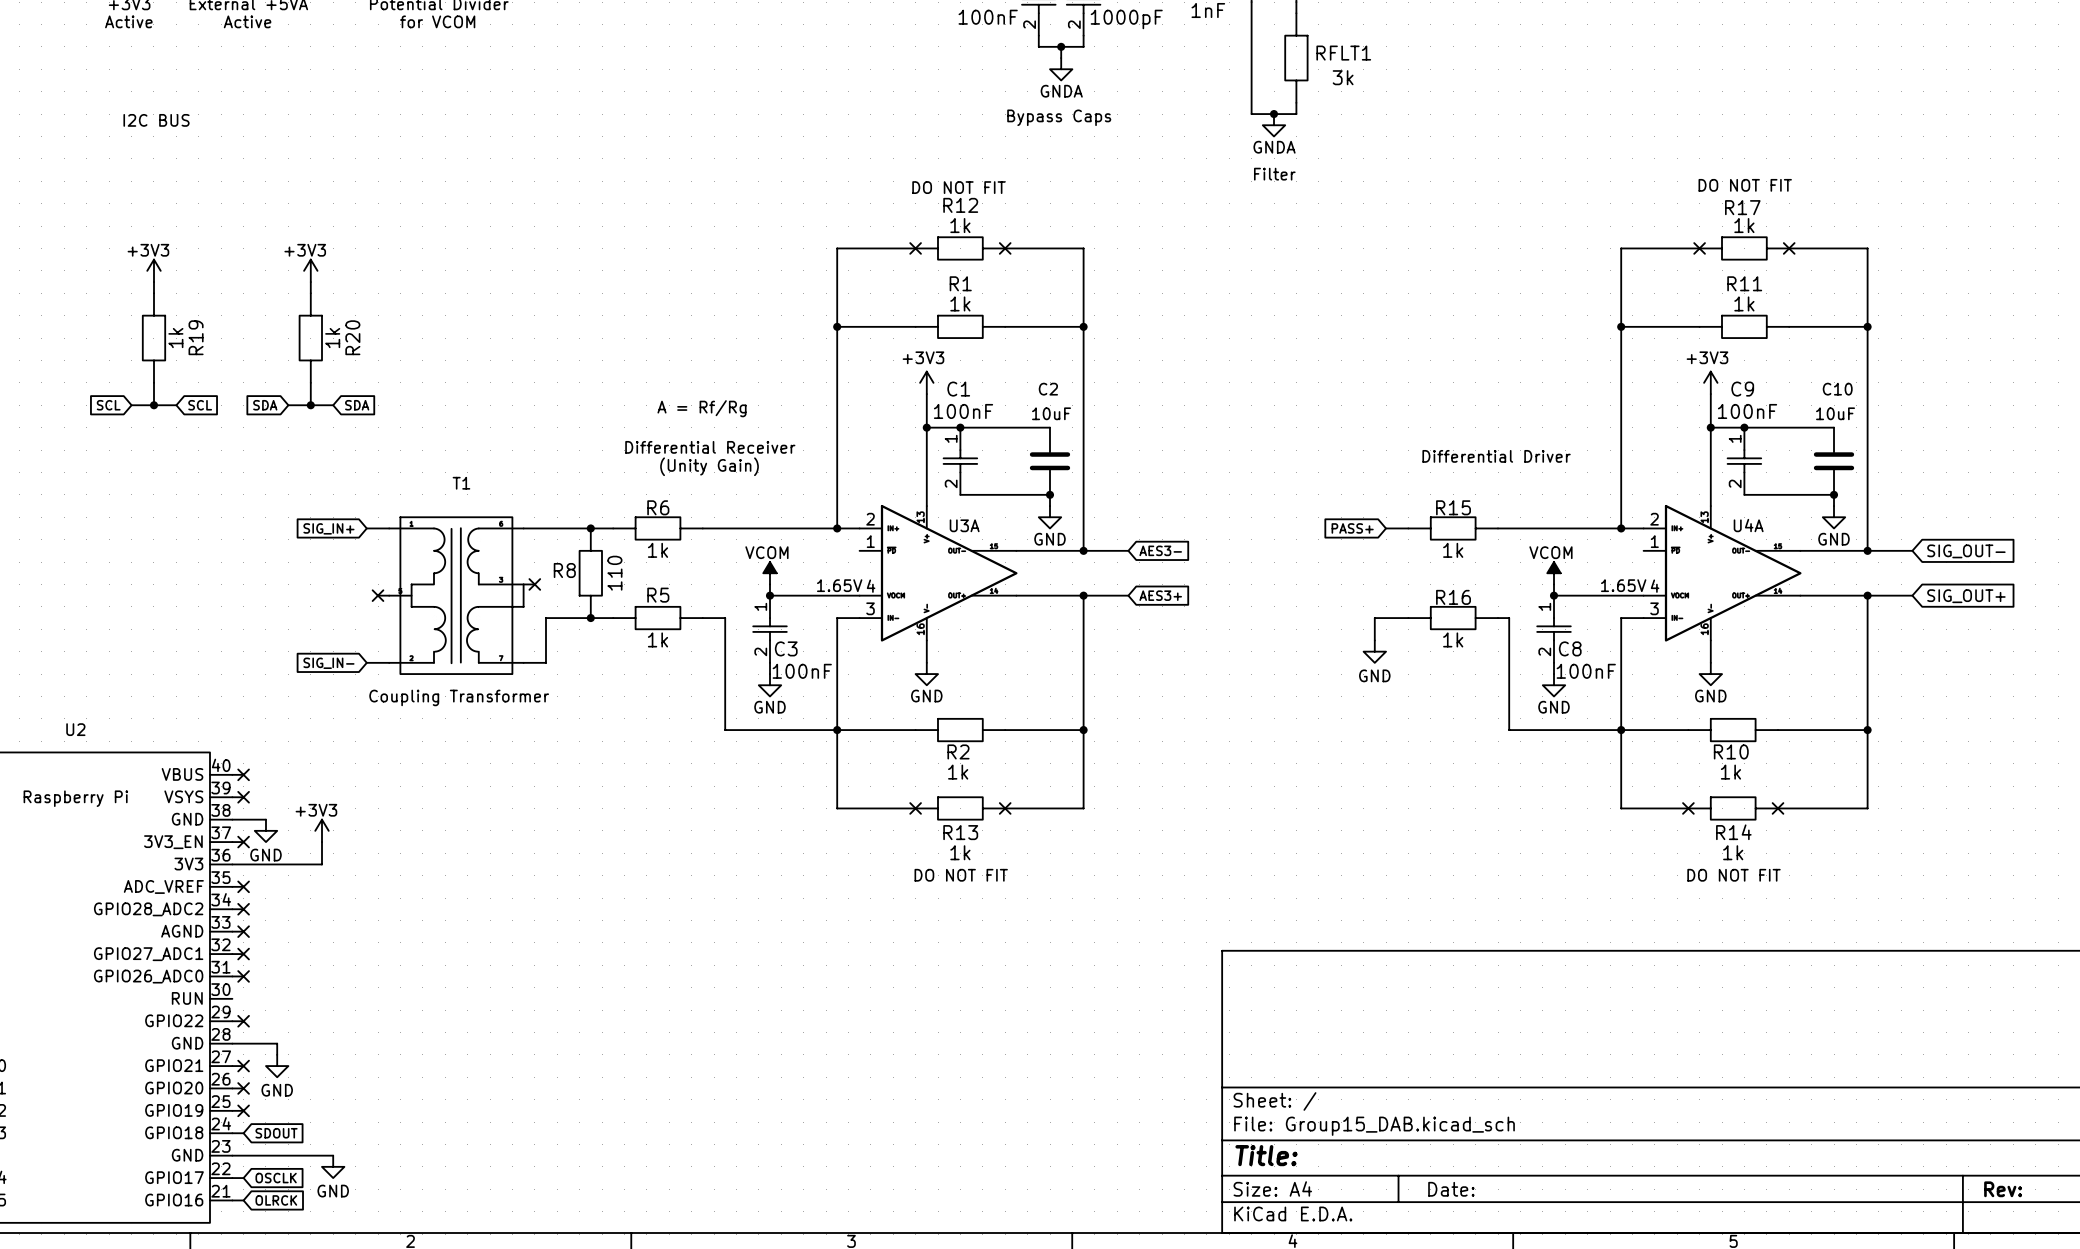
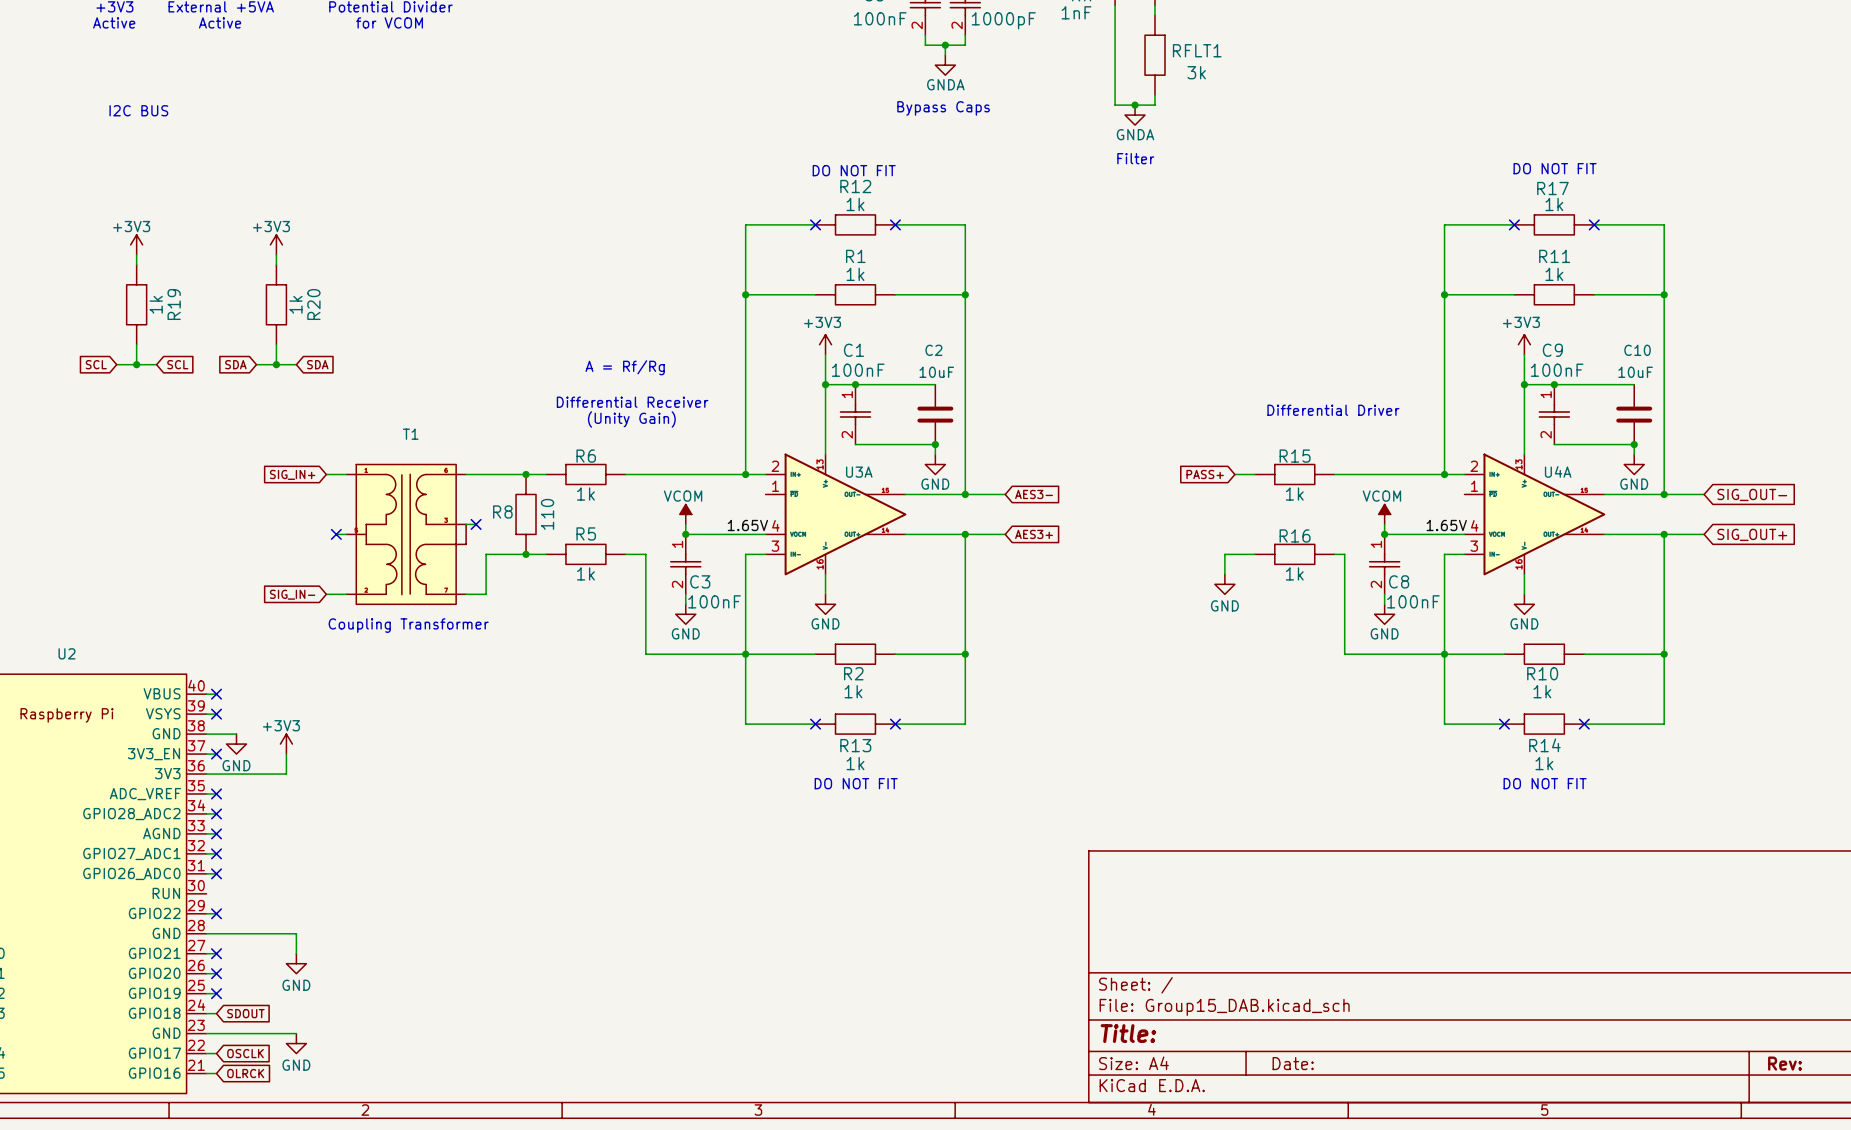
wire: (277, 1043) (277, 1054) -> (246, 933) (296, 933) (296, 953)
power symbol position: GND (277, 1066) -> GND (296, 963)

